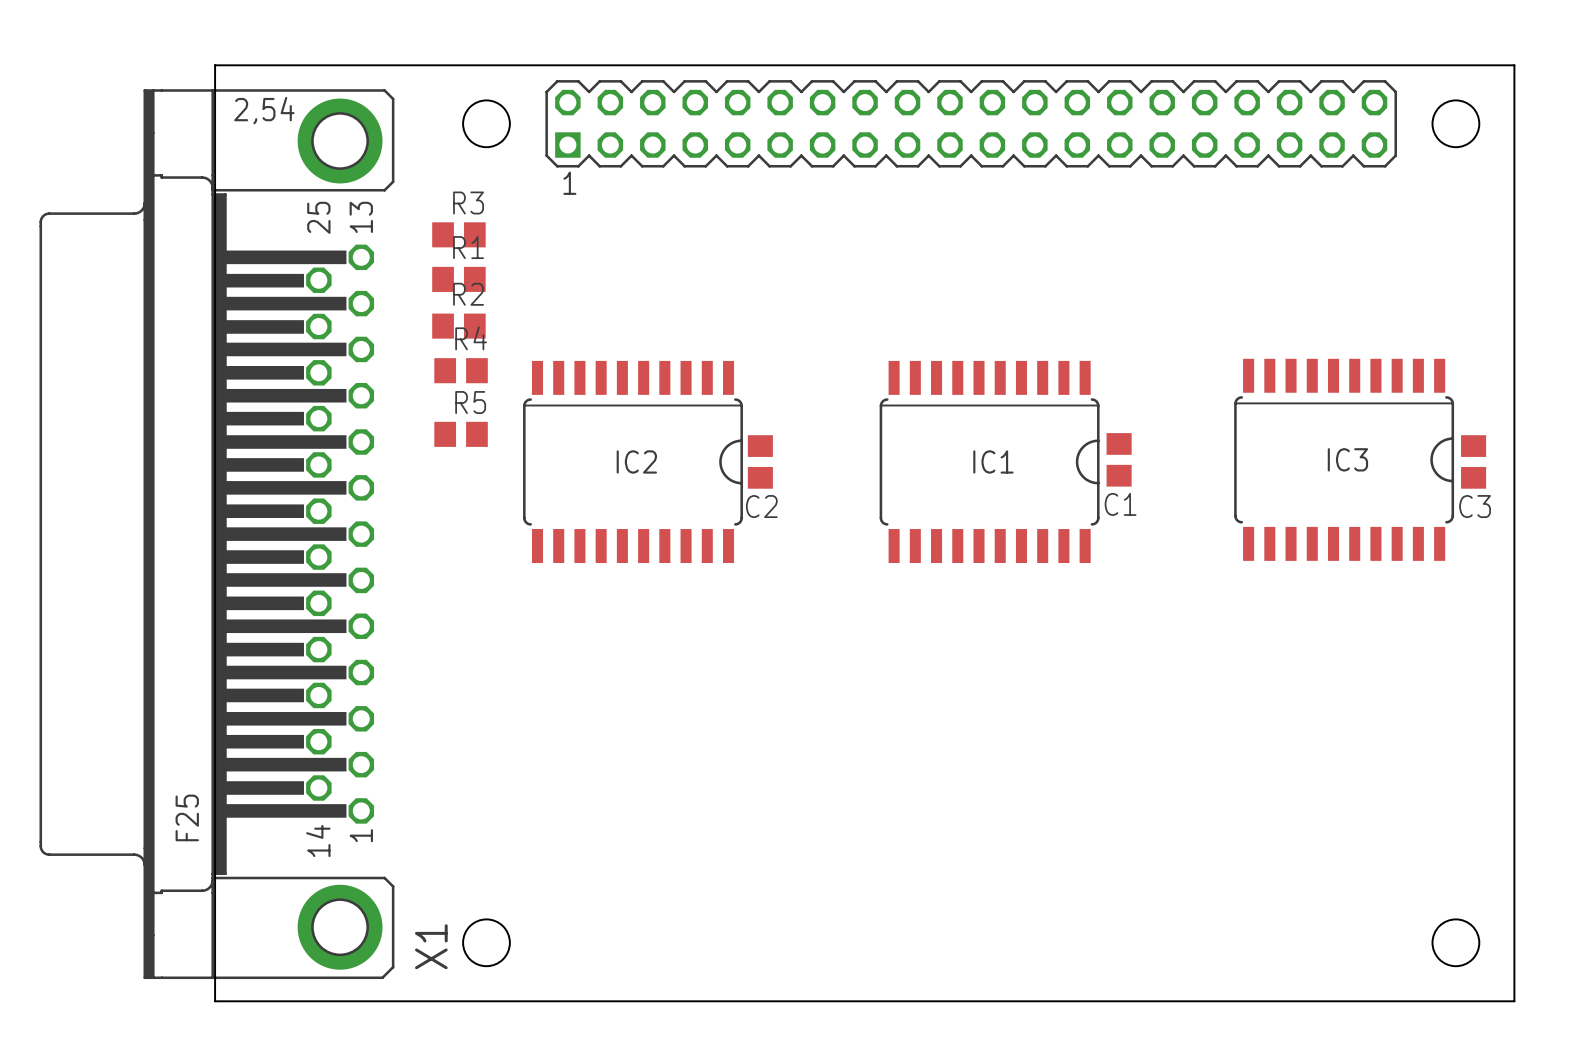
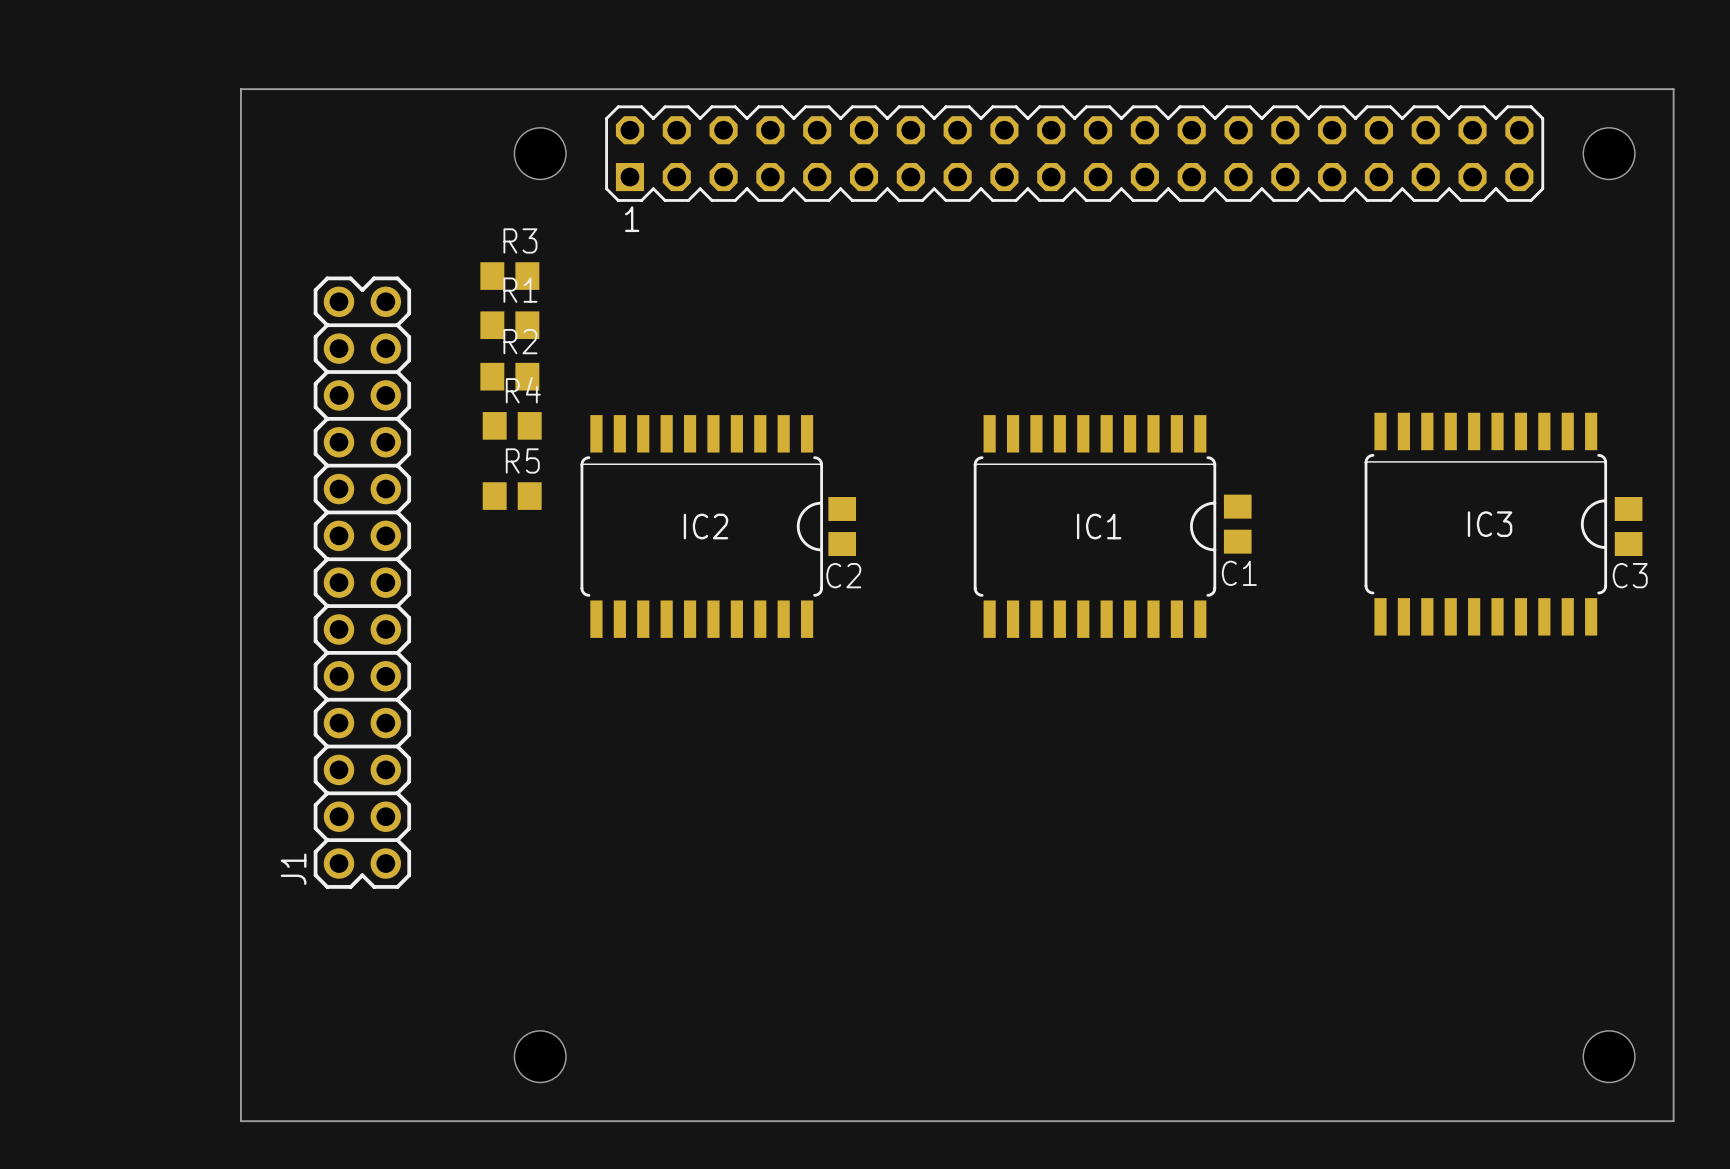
J1: none -> (362, 582)
X1: (216, 534) -> none

